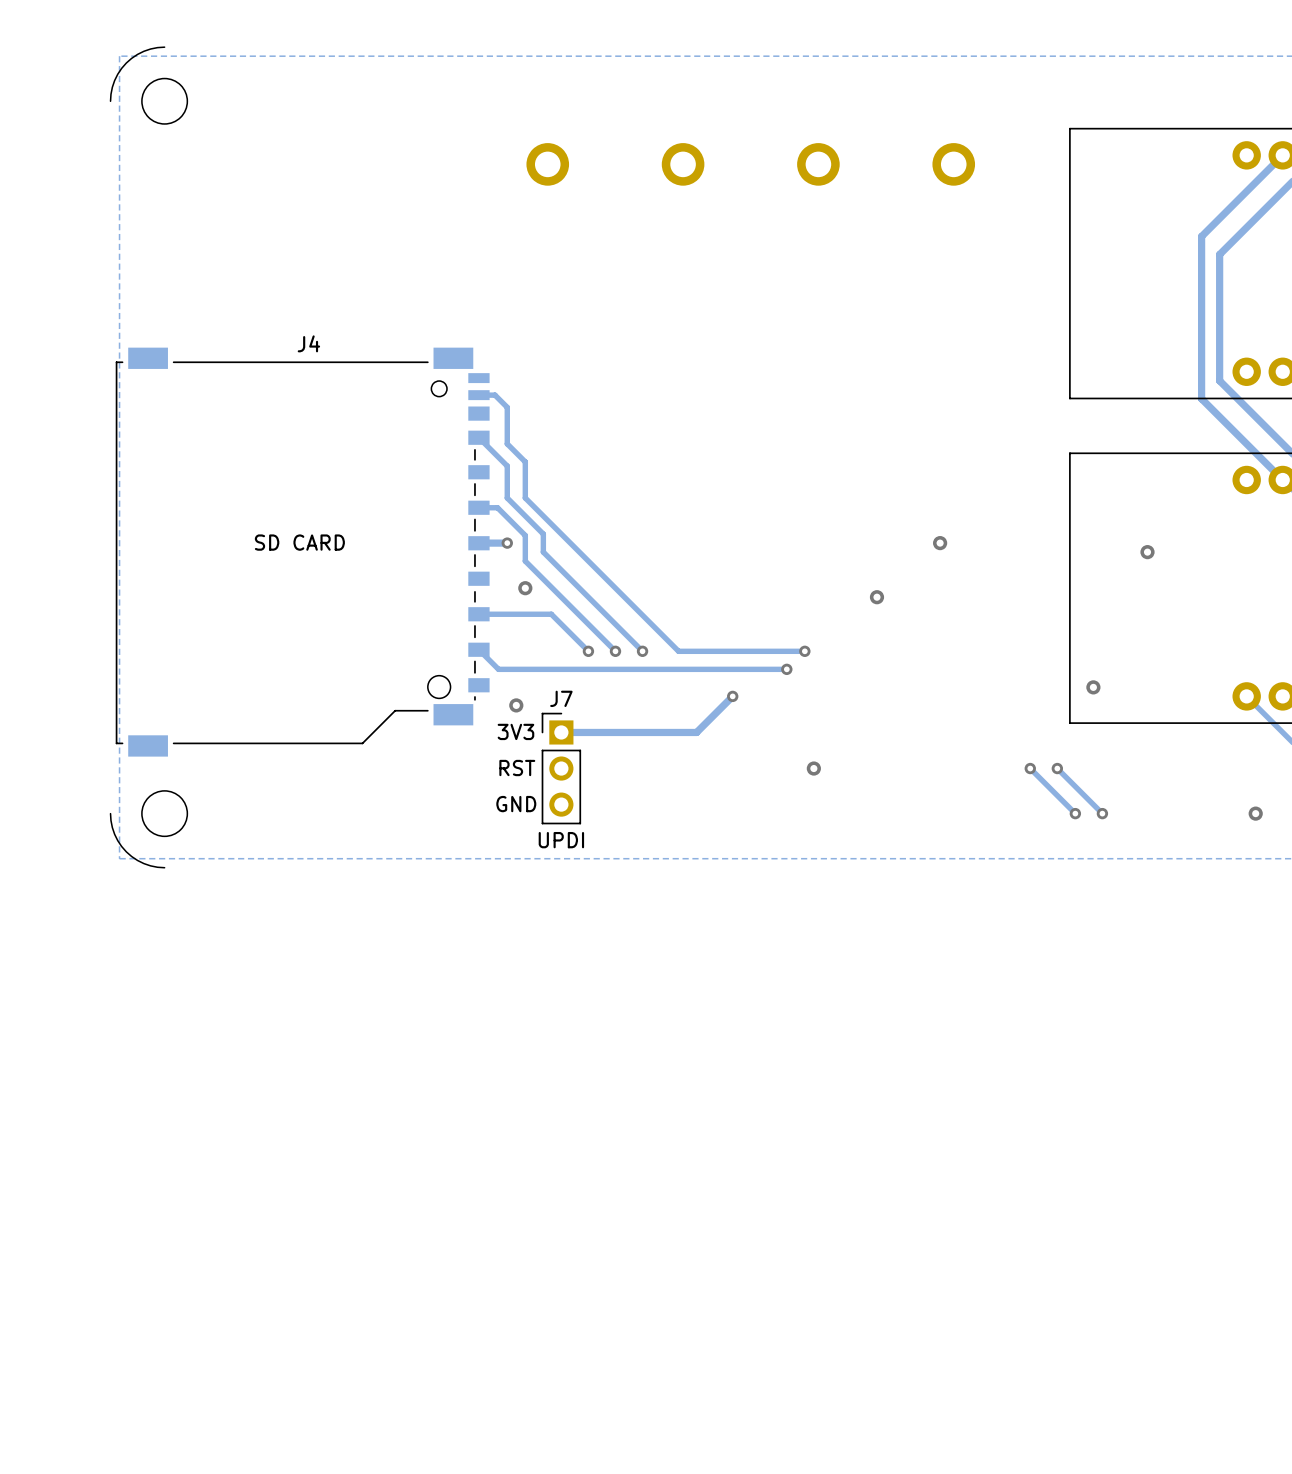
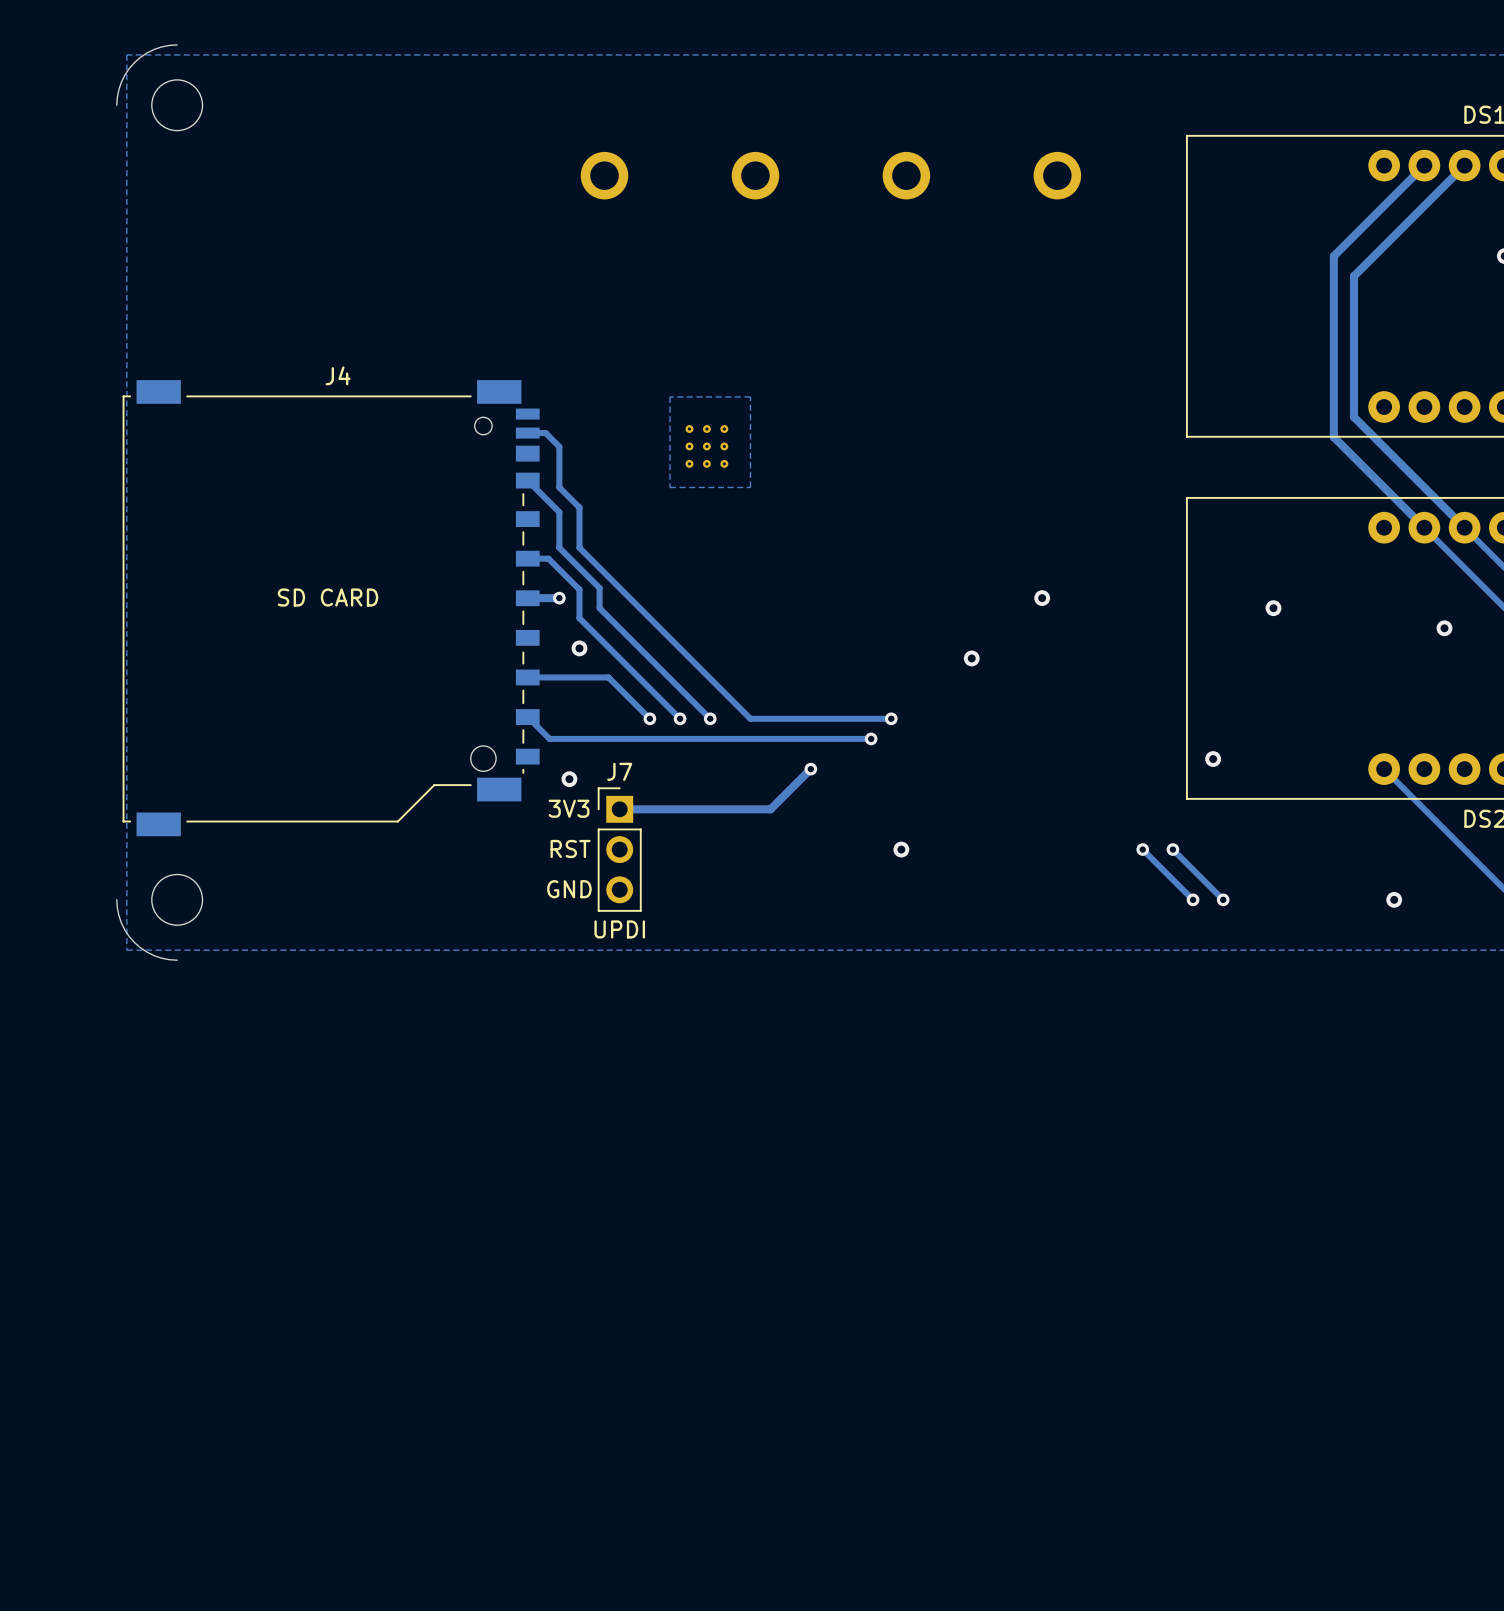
zone outline: none -> (750, 396) (750, 487) (670, 487) (670, 396) (750, 396)
part: none -> (706, 446)

